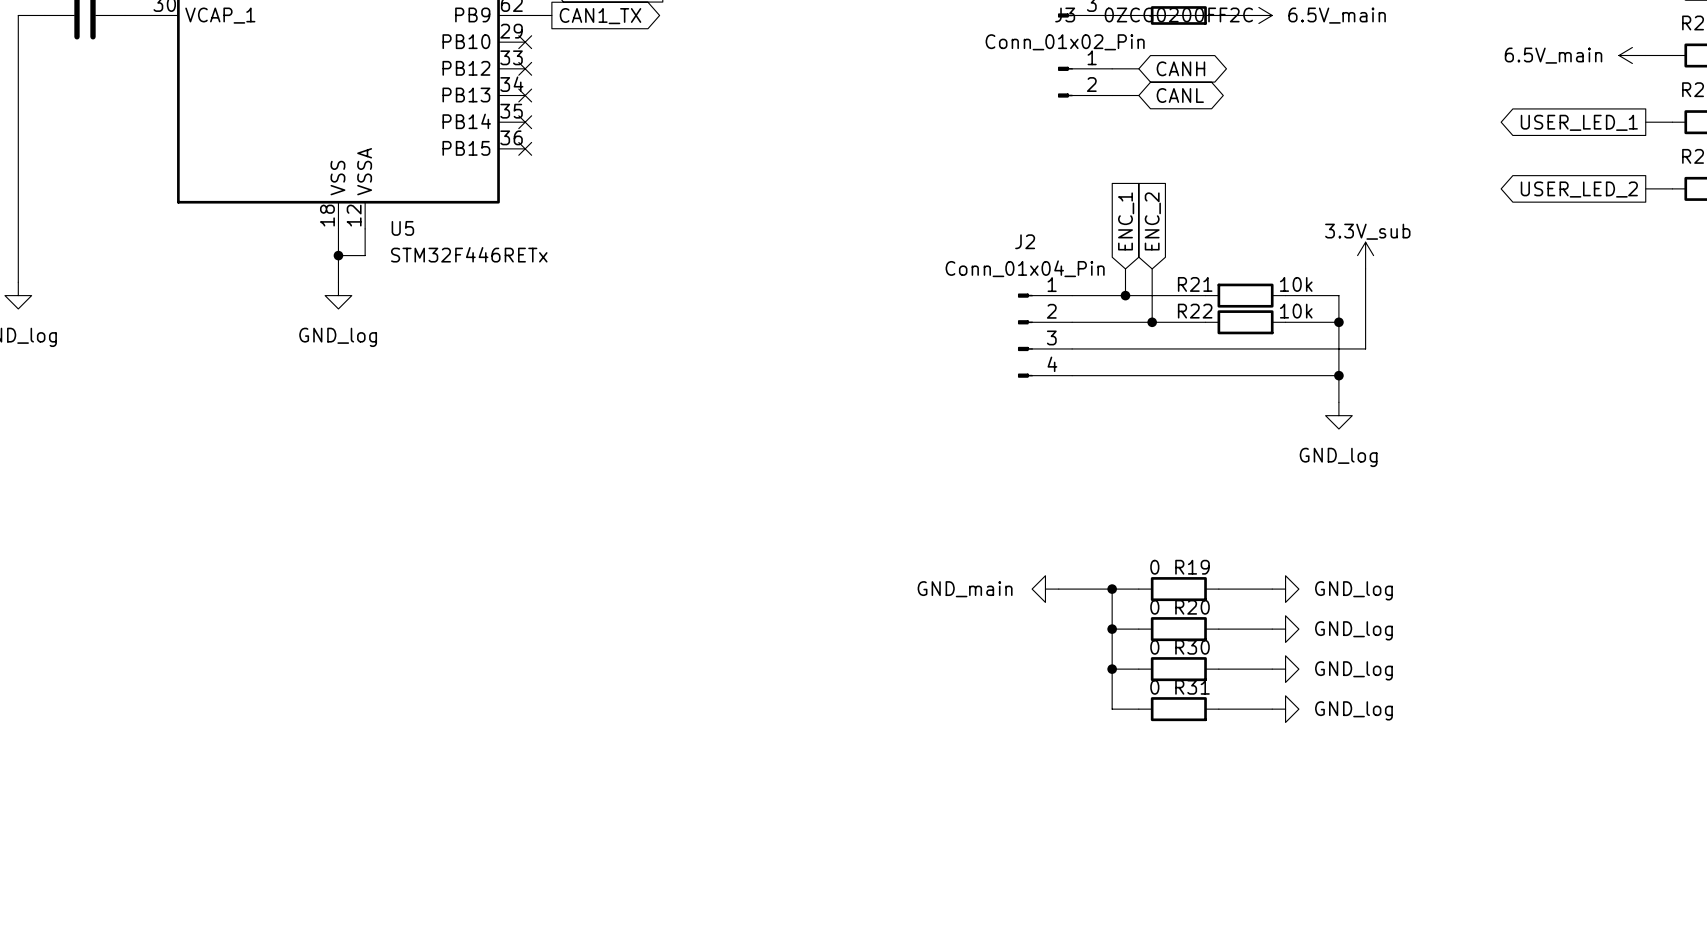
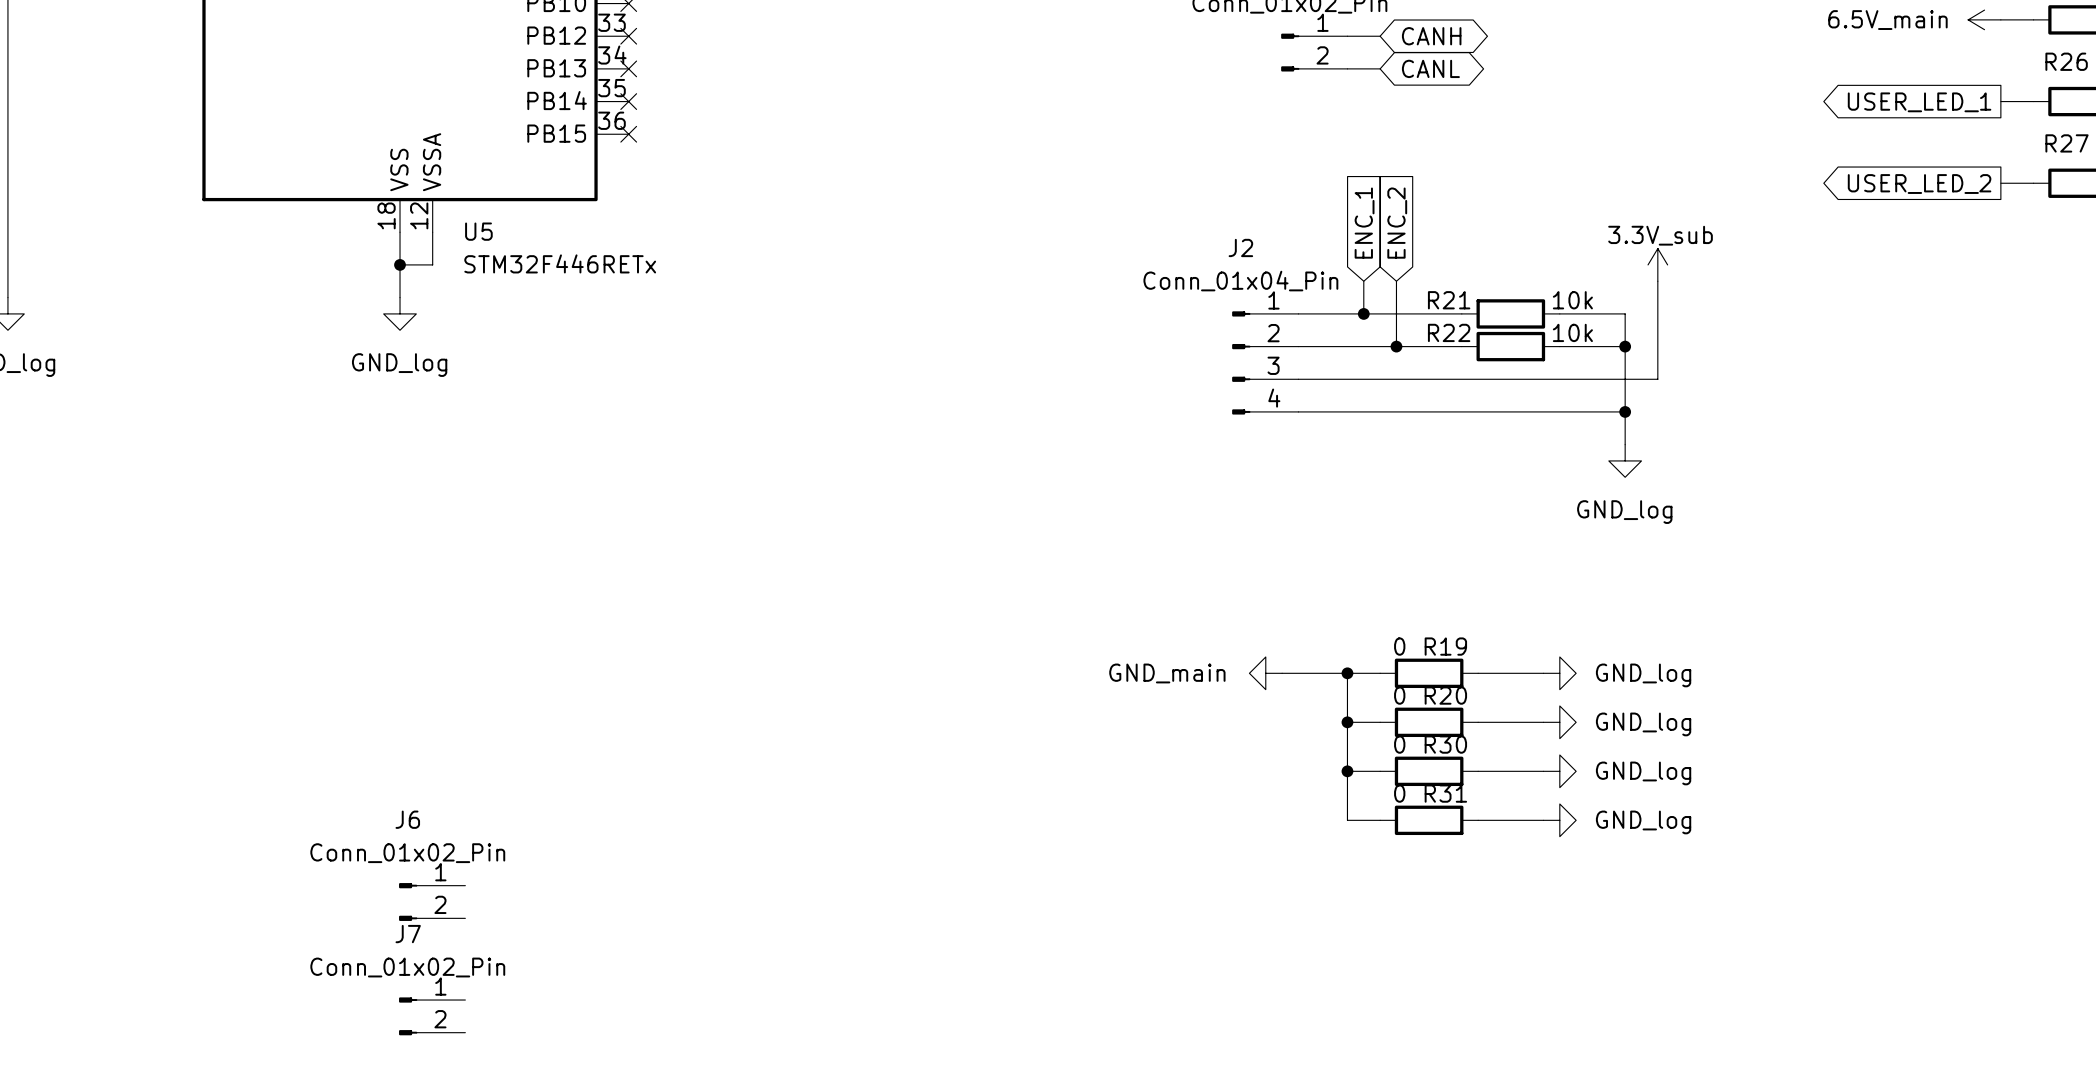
J6: none -> Conn_01x02_Pin (432, 902)
J7: none -> Conn_01x02_Pin (432, 1016)

